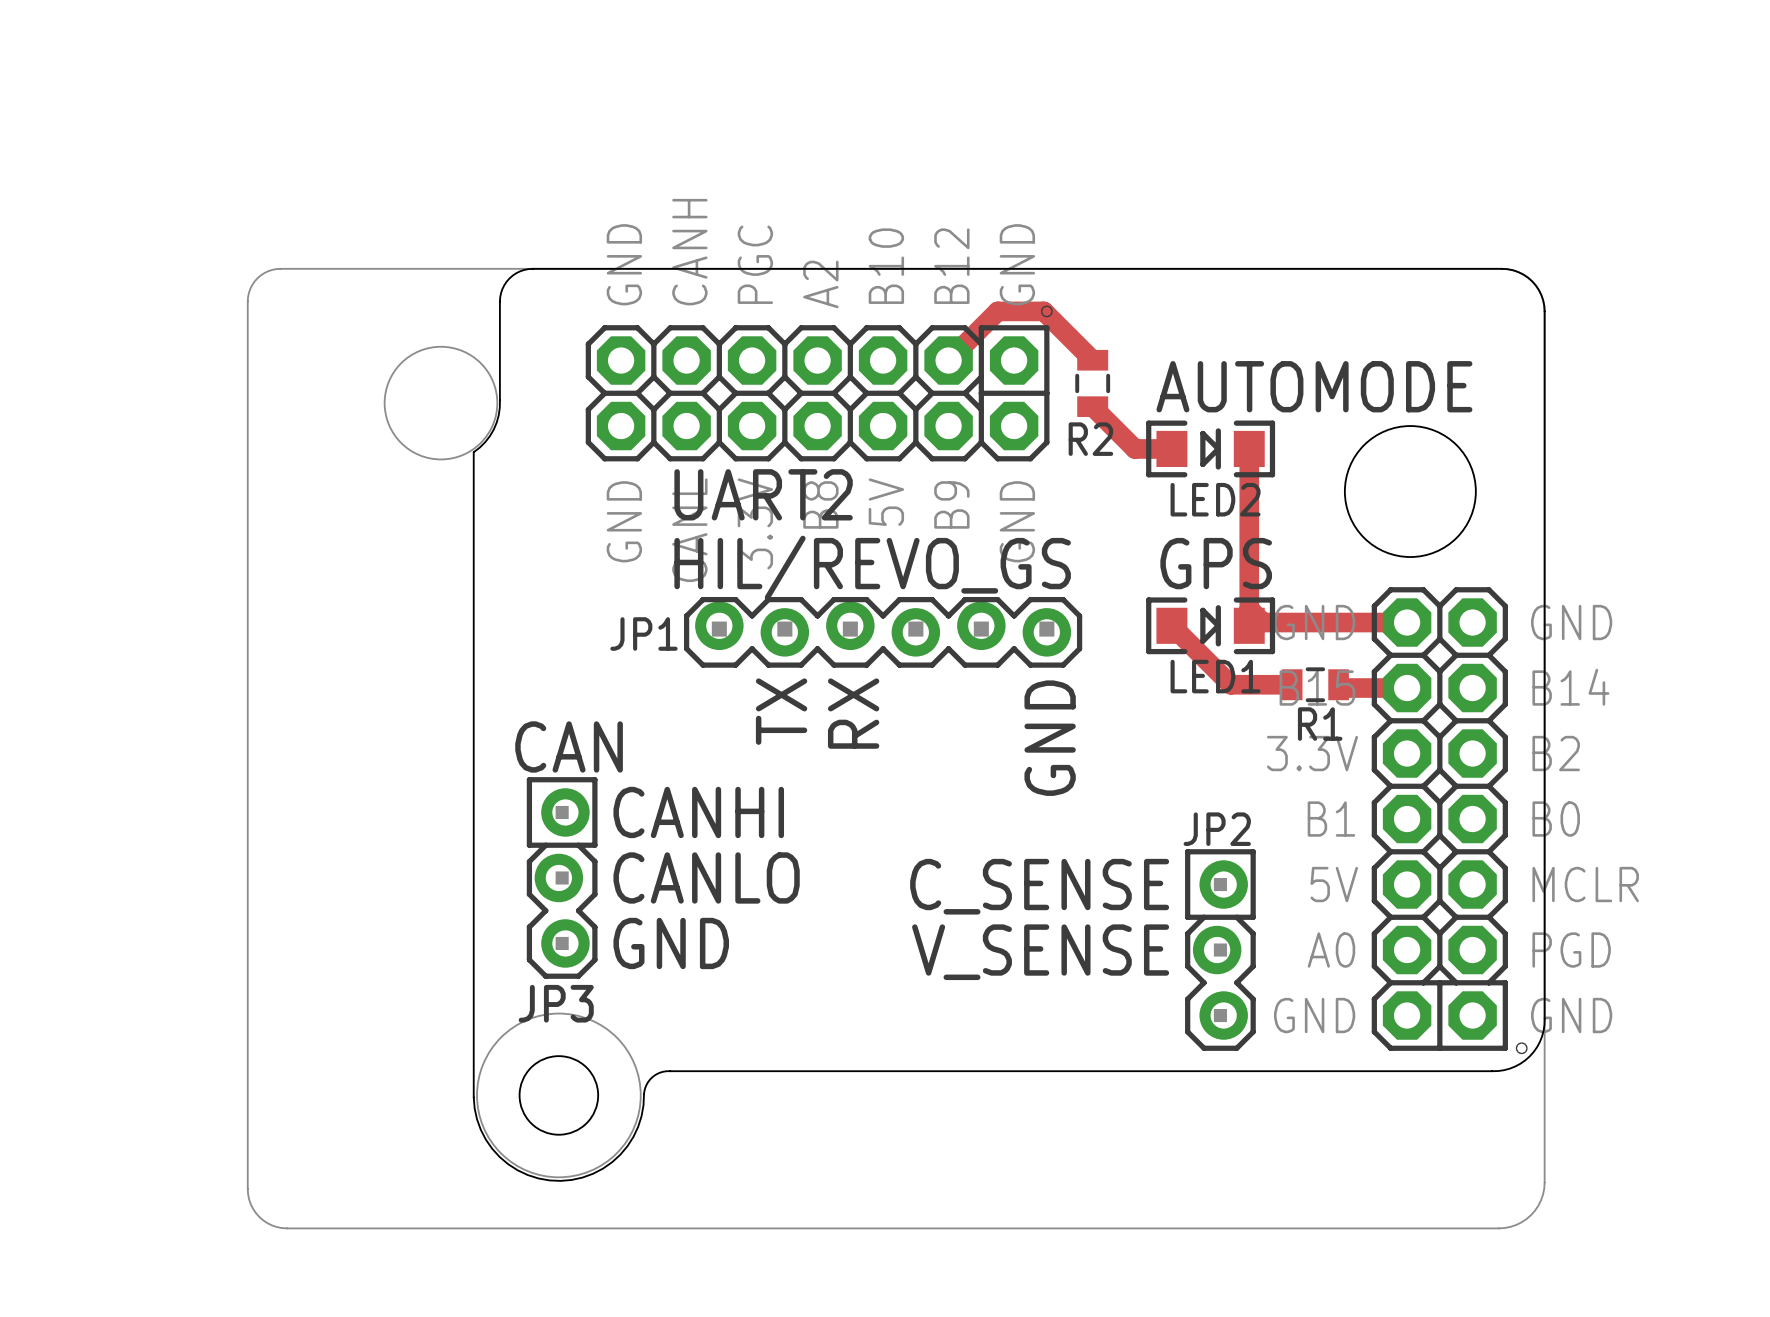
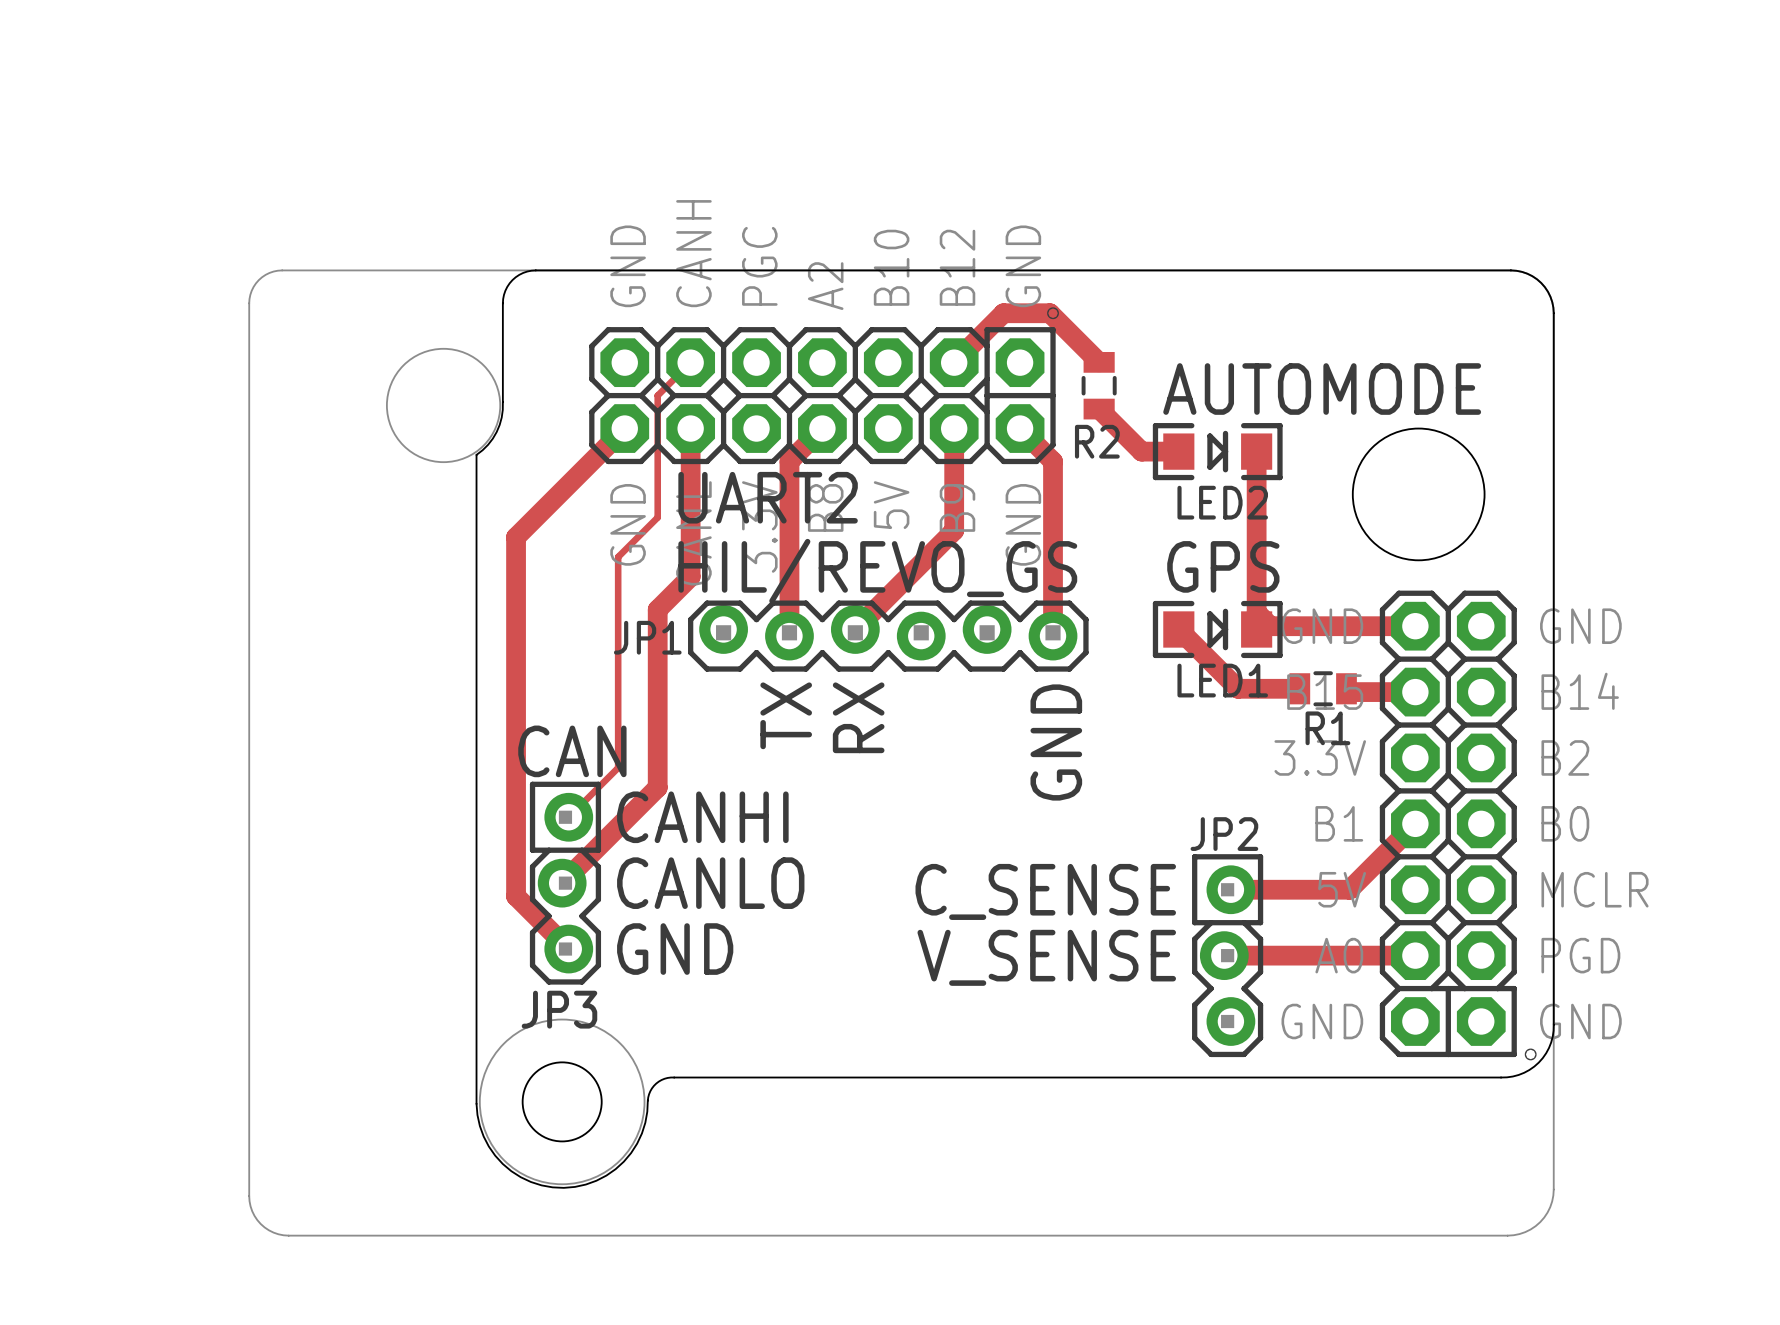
track: none -> (690, 362) (657, 395) (657, 517) (618, 557) (618, 767) (568, 817)
track: none -> (624, 428) (516, 537) (516, 896) (568, 949)
track: none -> (690, 428) (690, 576) (657, 609) (657, 787) (562, 883)
track: none -> (822, 428) (789, 461) (789, 636)
track: none -> (954, 428) (954, 530) (855, 629)
track: none -> (1020, 428) (1053, 461) (1053, 636)
track: none -> (1415, 823) (1349, 889) (1230, 889)
track: none -> (1224, 955) (1415, 955)

